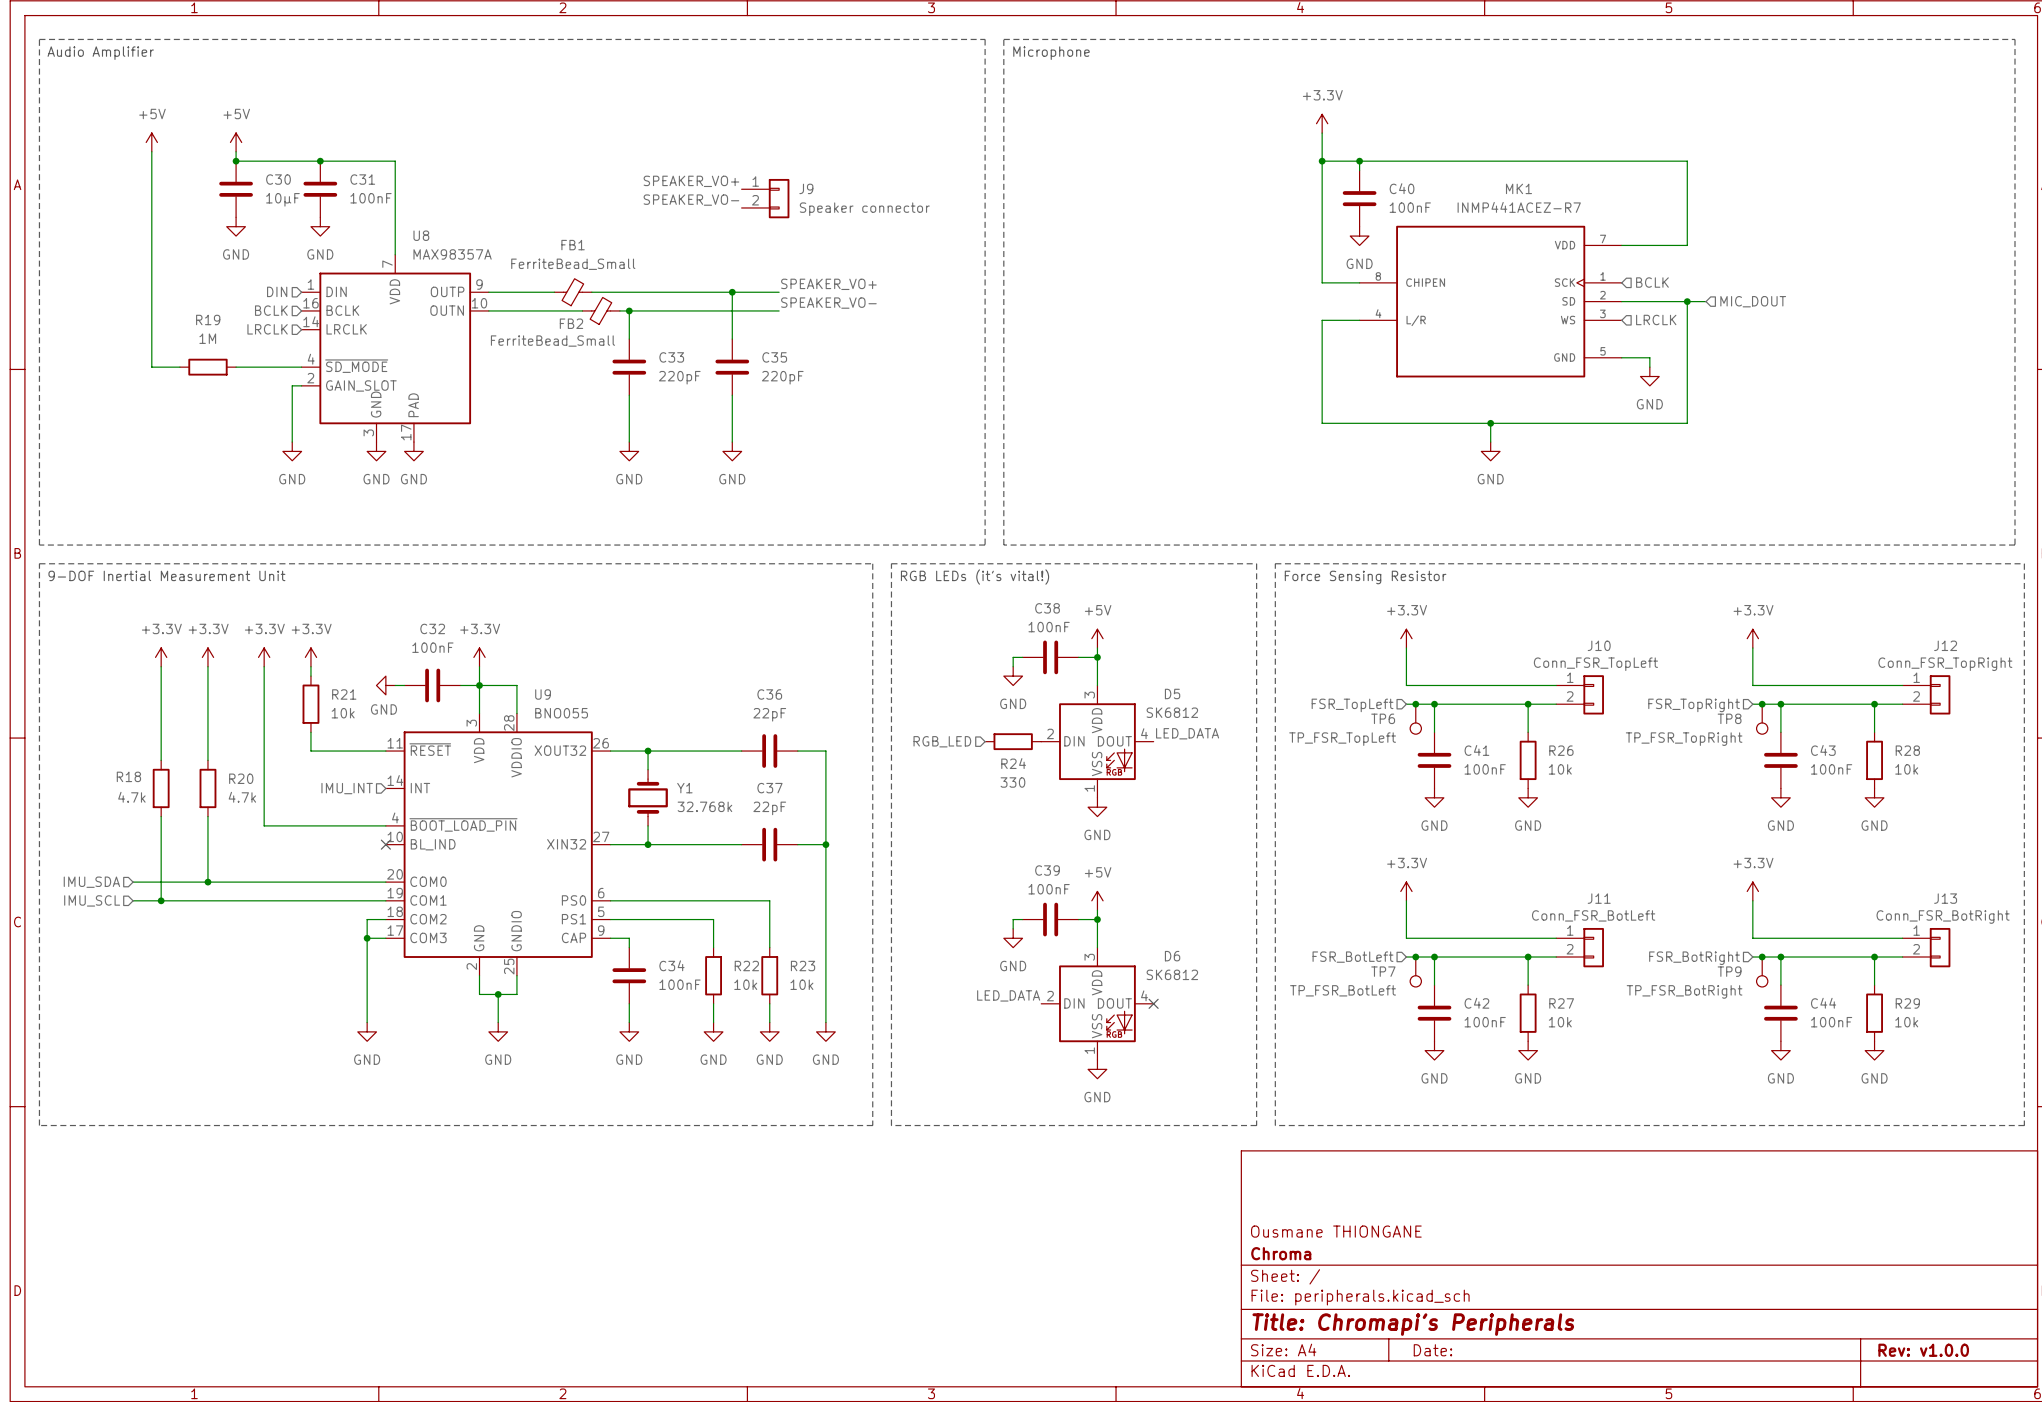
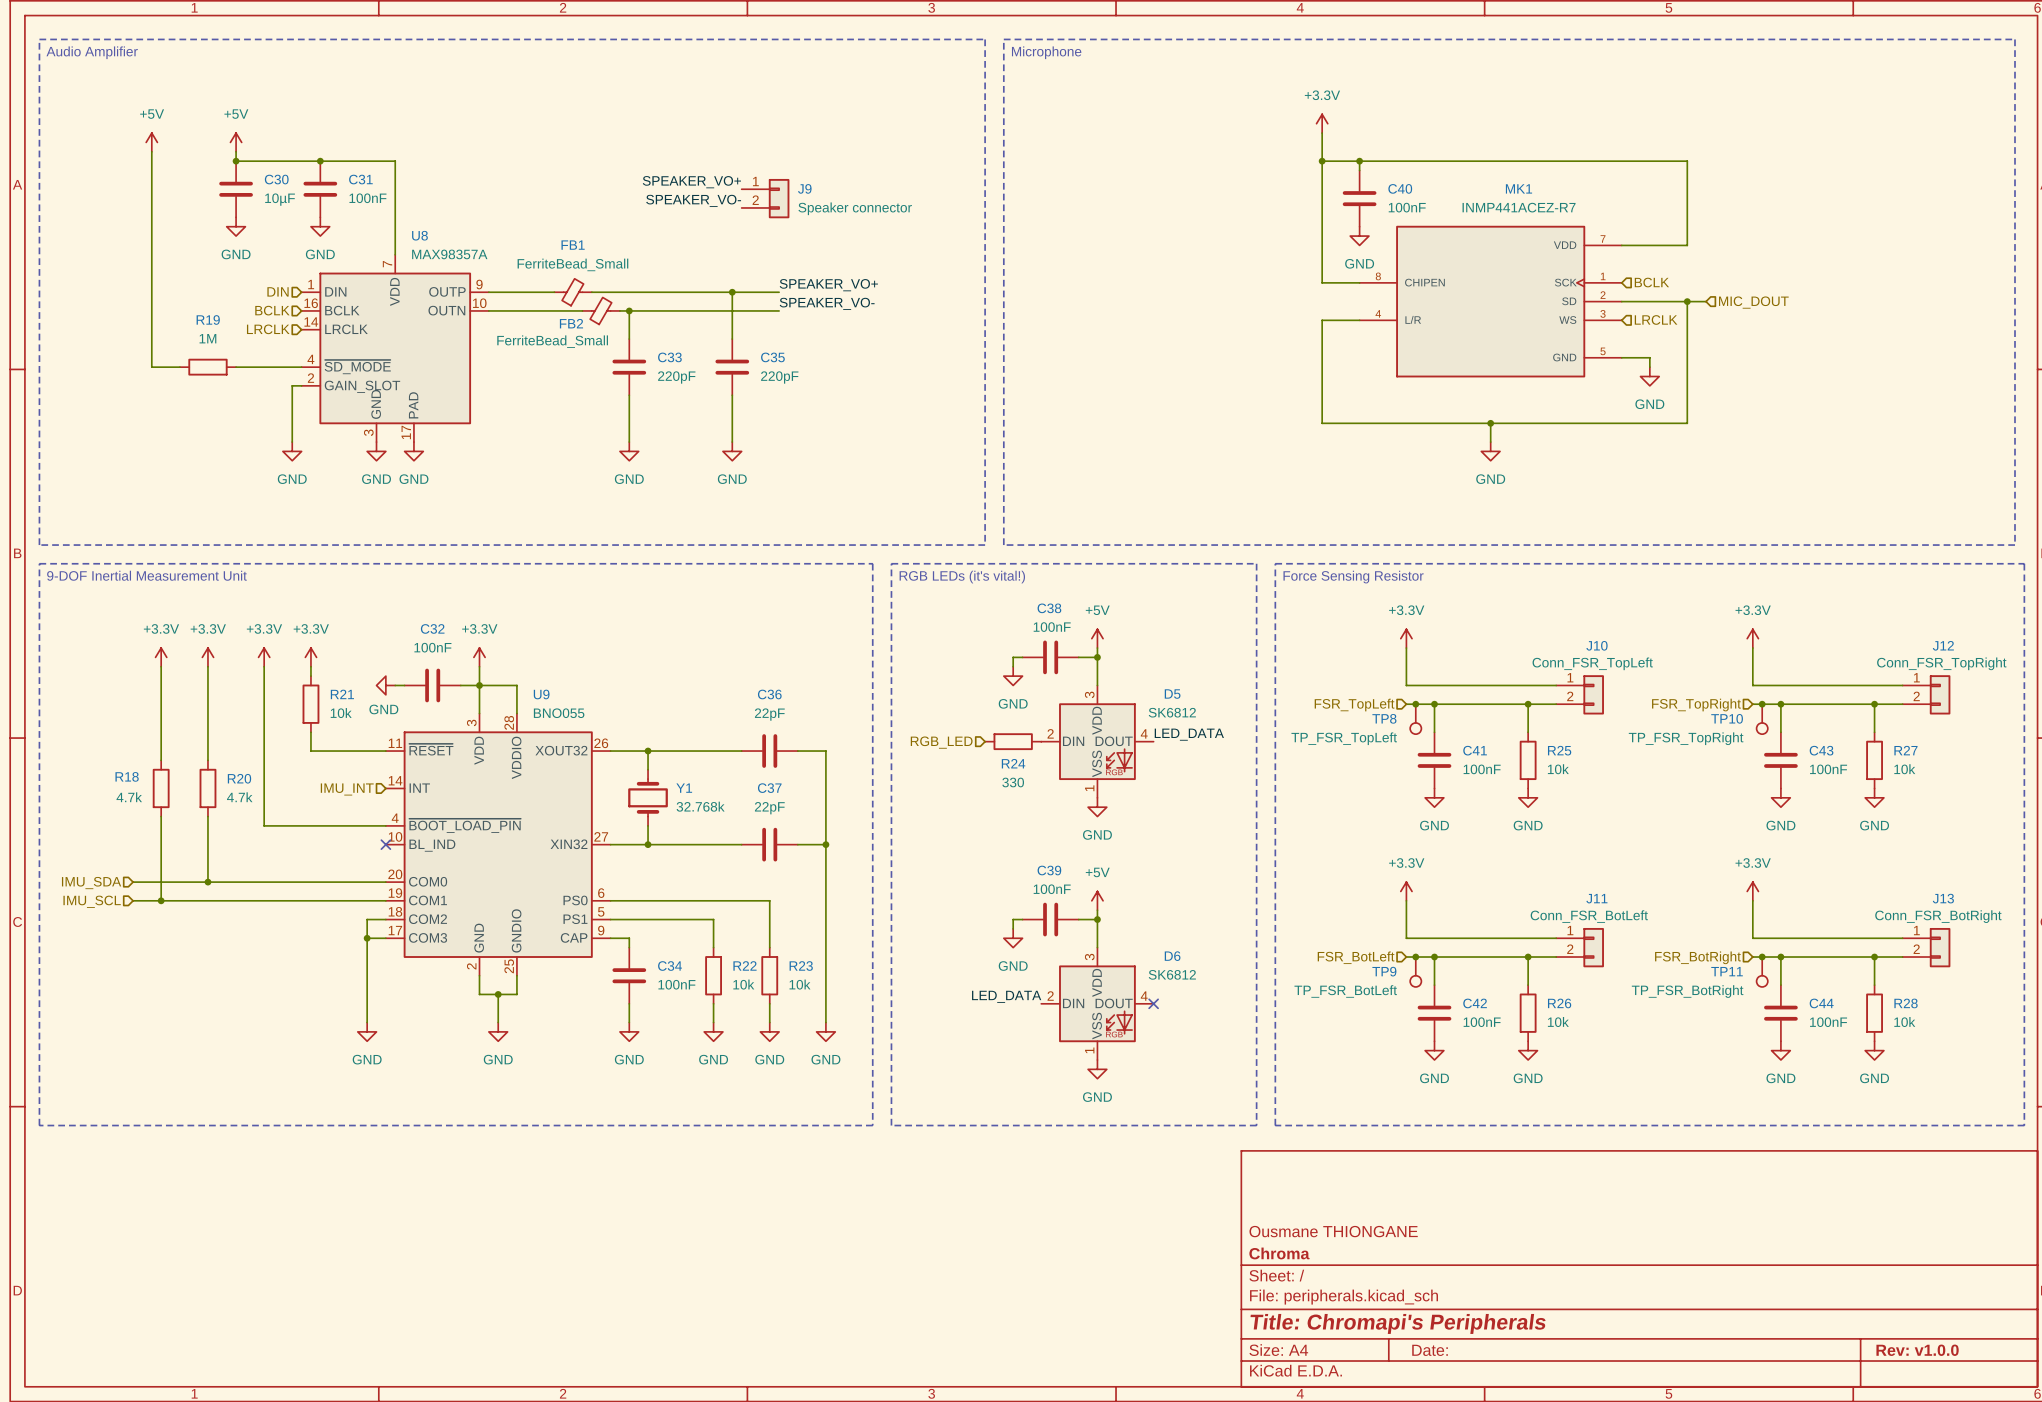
TP6 name: TP6 (1383, 718) -> TP8 (1384, 718)
TP8 name: TP8 (1729, 718) -> TP10 (1727, 718)
R26 name: R26 (1561, 750) -> R25 (1559, 750)
R28 name: R28 (1907, 750) -> R27 (1905, 750)
TP7 name: TP7 (1383, 971) -> TP9 (1384, 971)
TP9 name: TP9 (1729, 971) -> TP11 (1727, 971)
R27 name: R27 (1561, 1003) -> R26 (1559, 1003)
R29 name: R29 (1907, 1003) -> R28 (1906, 1003)

